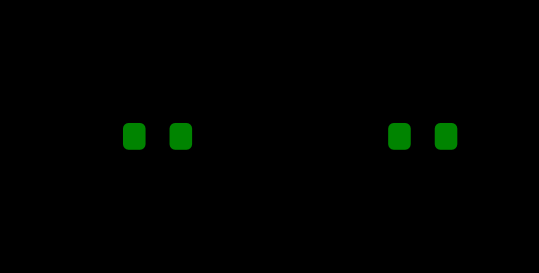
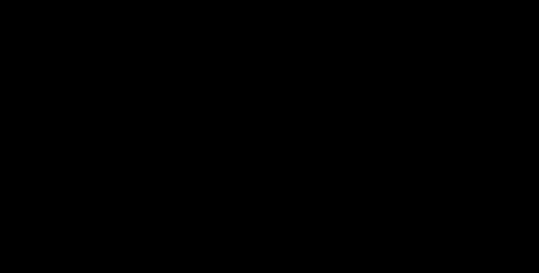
part: (157, 136) -> none
part: (422, 136) -> none

